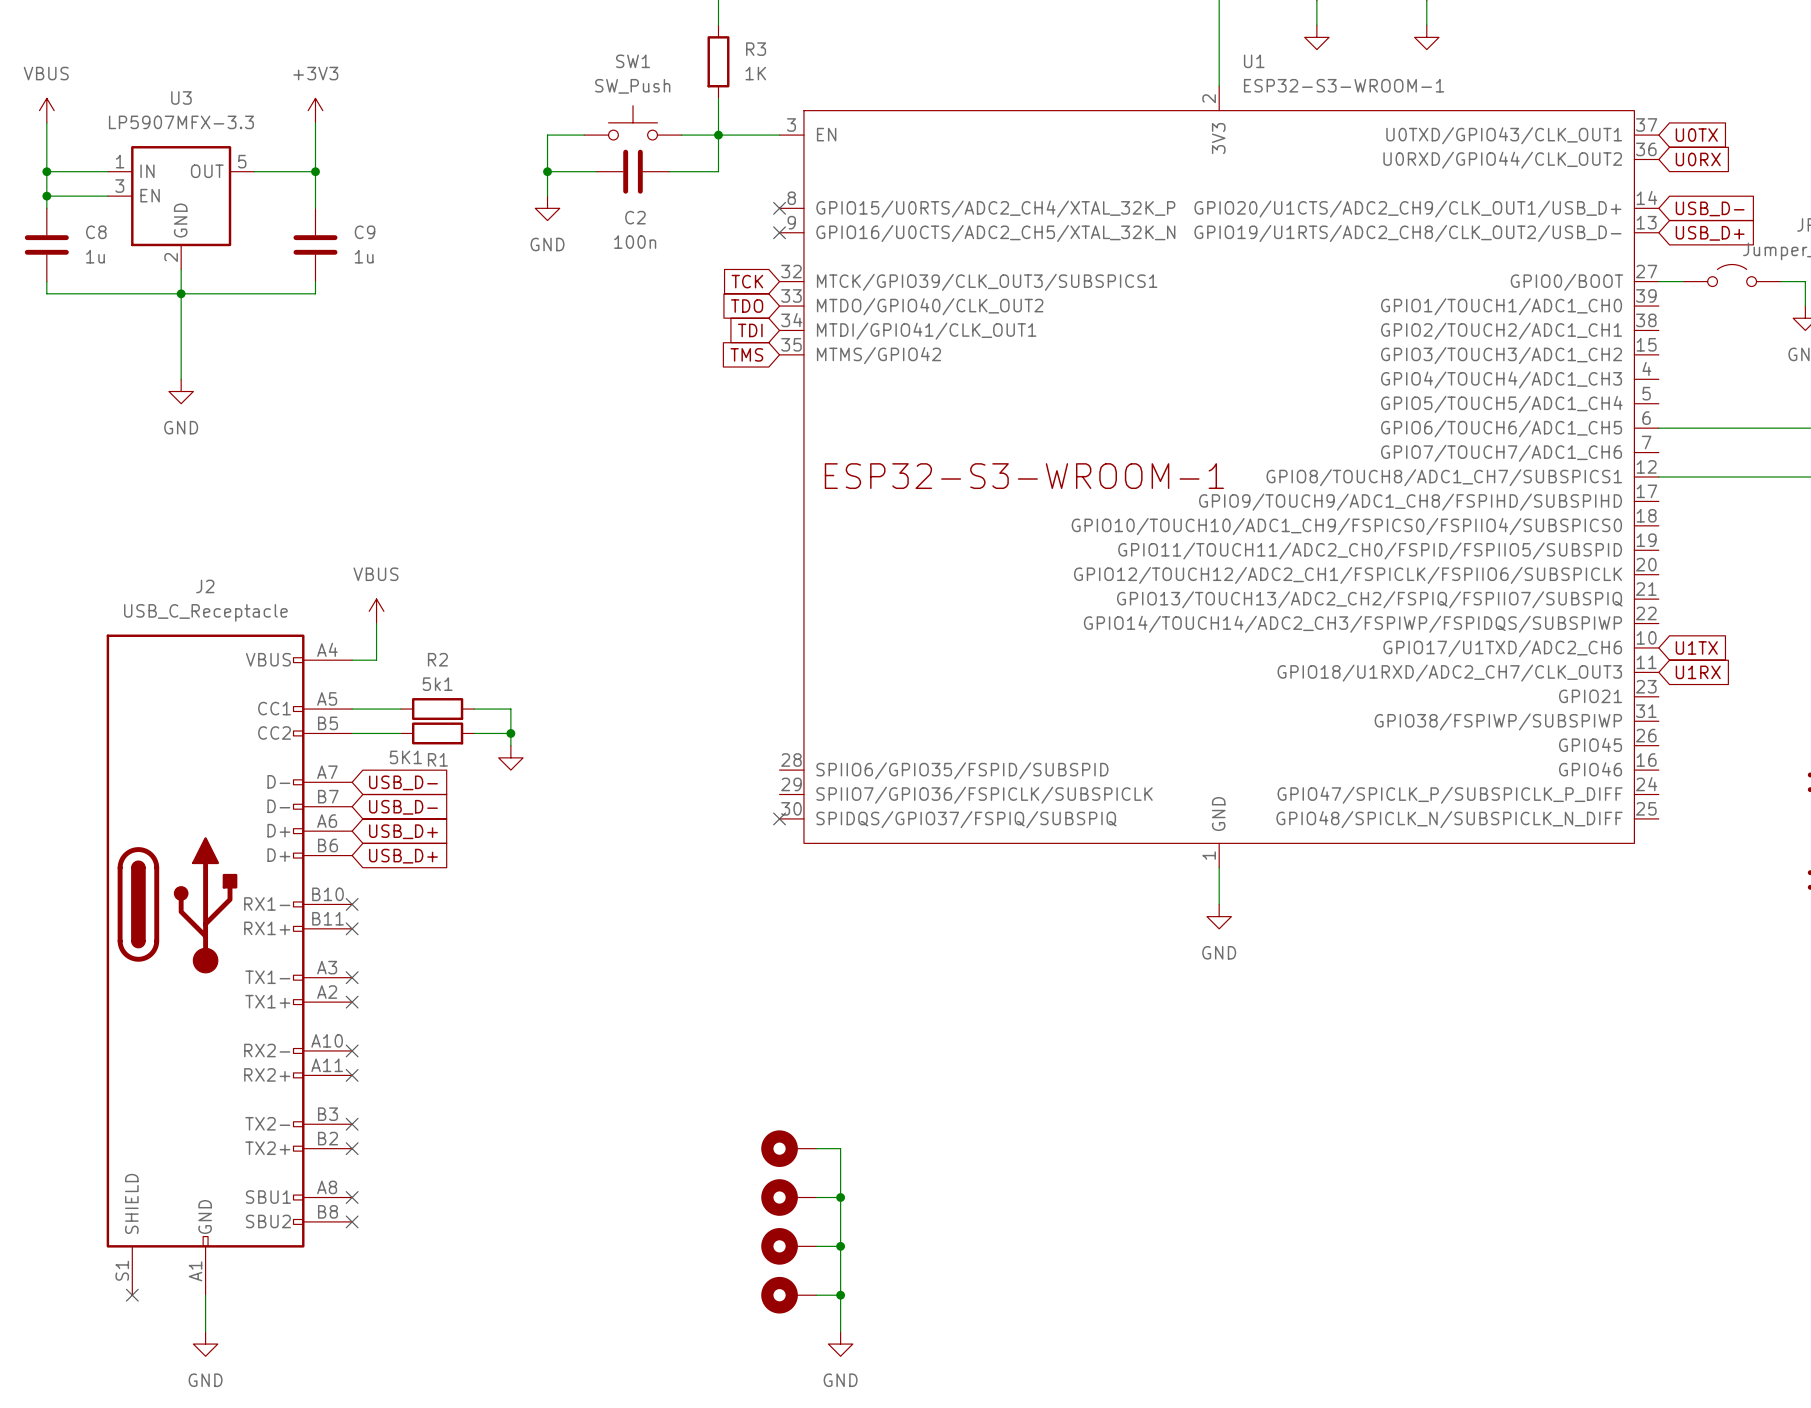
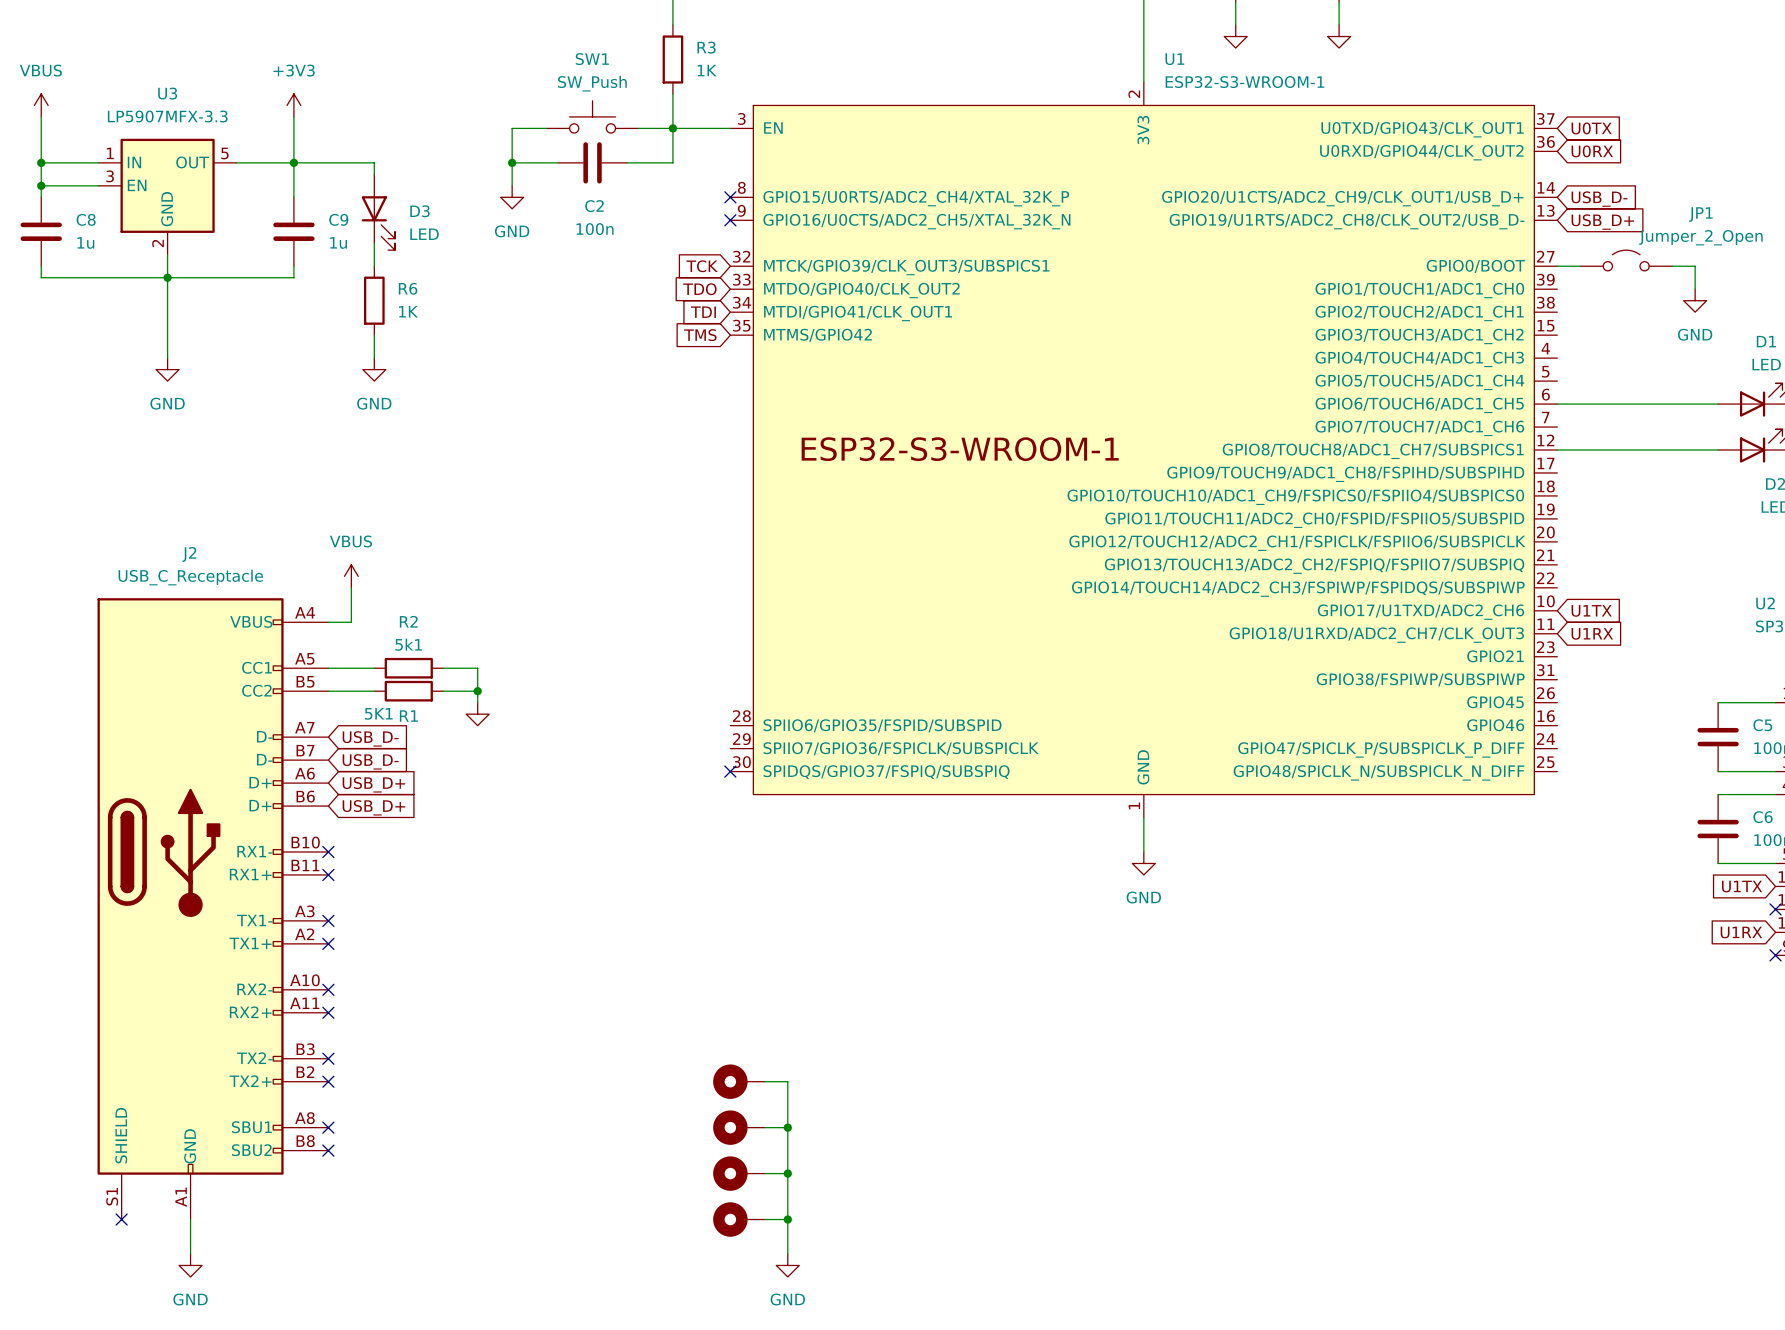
wire: none -> (293, 162) (374, 162) (374, 174)
D3: none -> LED (378, 212)
wire: none -> (374, 243) (374, 266)
R6: none -> 1K (374, 300)
wire: none -> (374, 335) (374, 358)
power symbol: none -> GND (374, 369)

